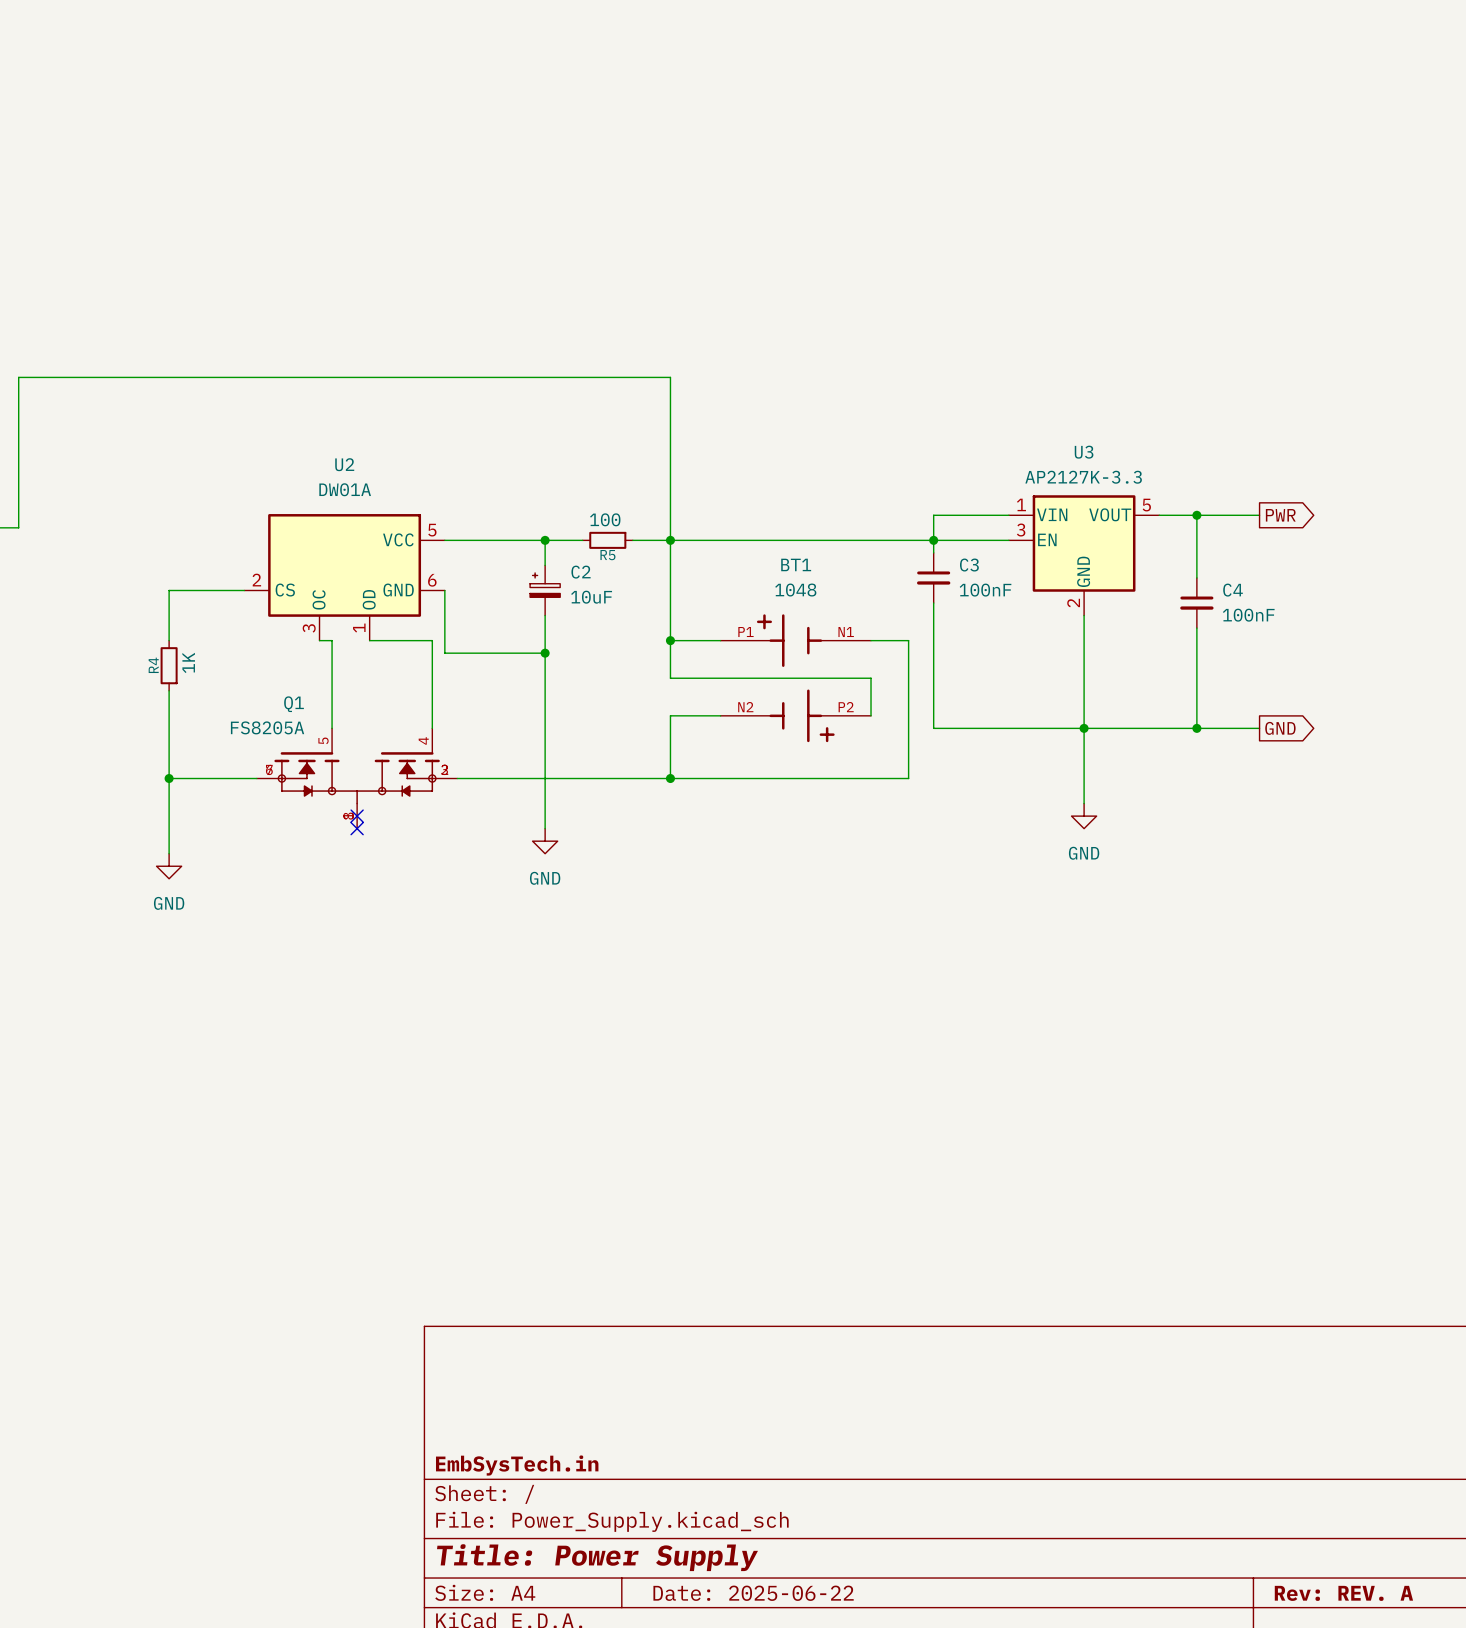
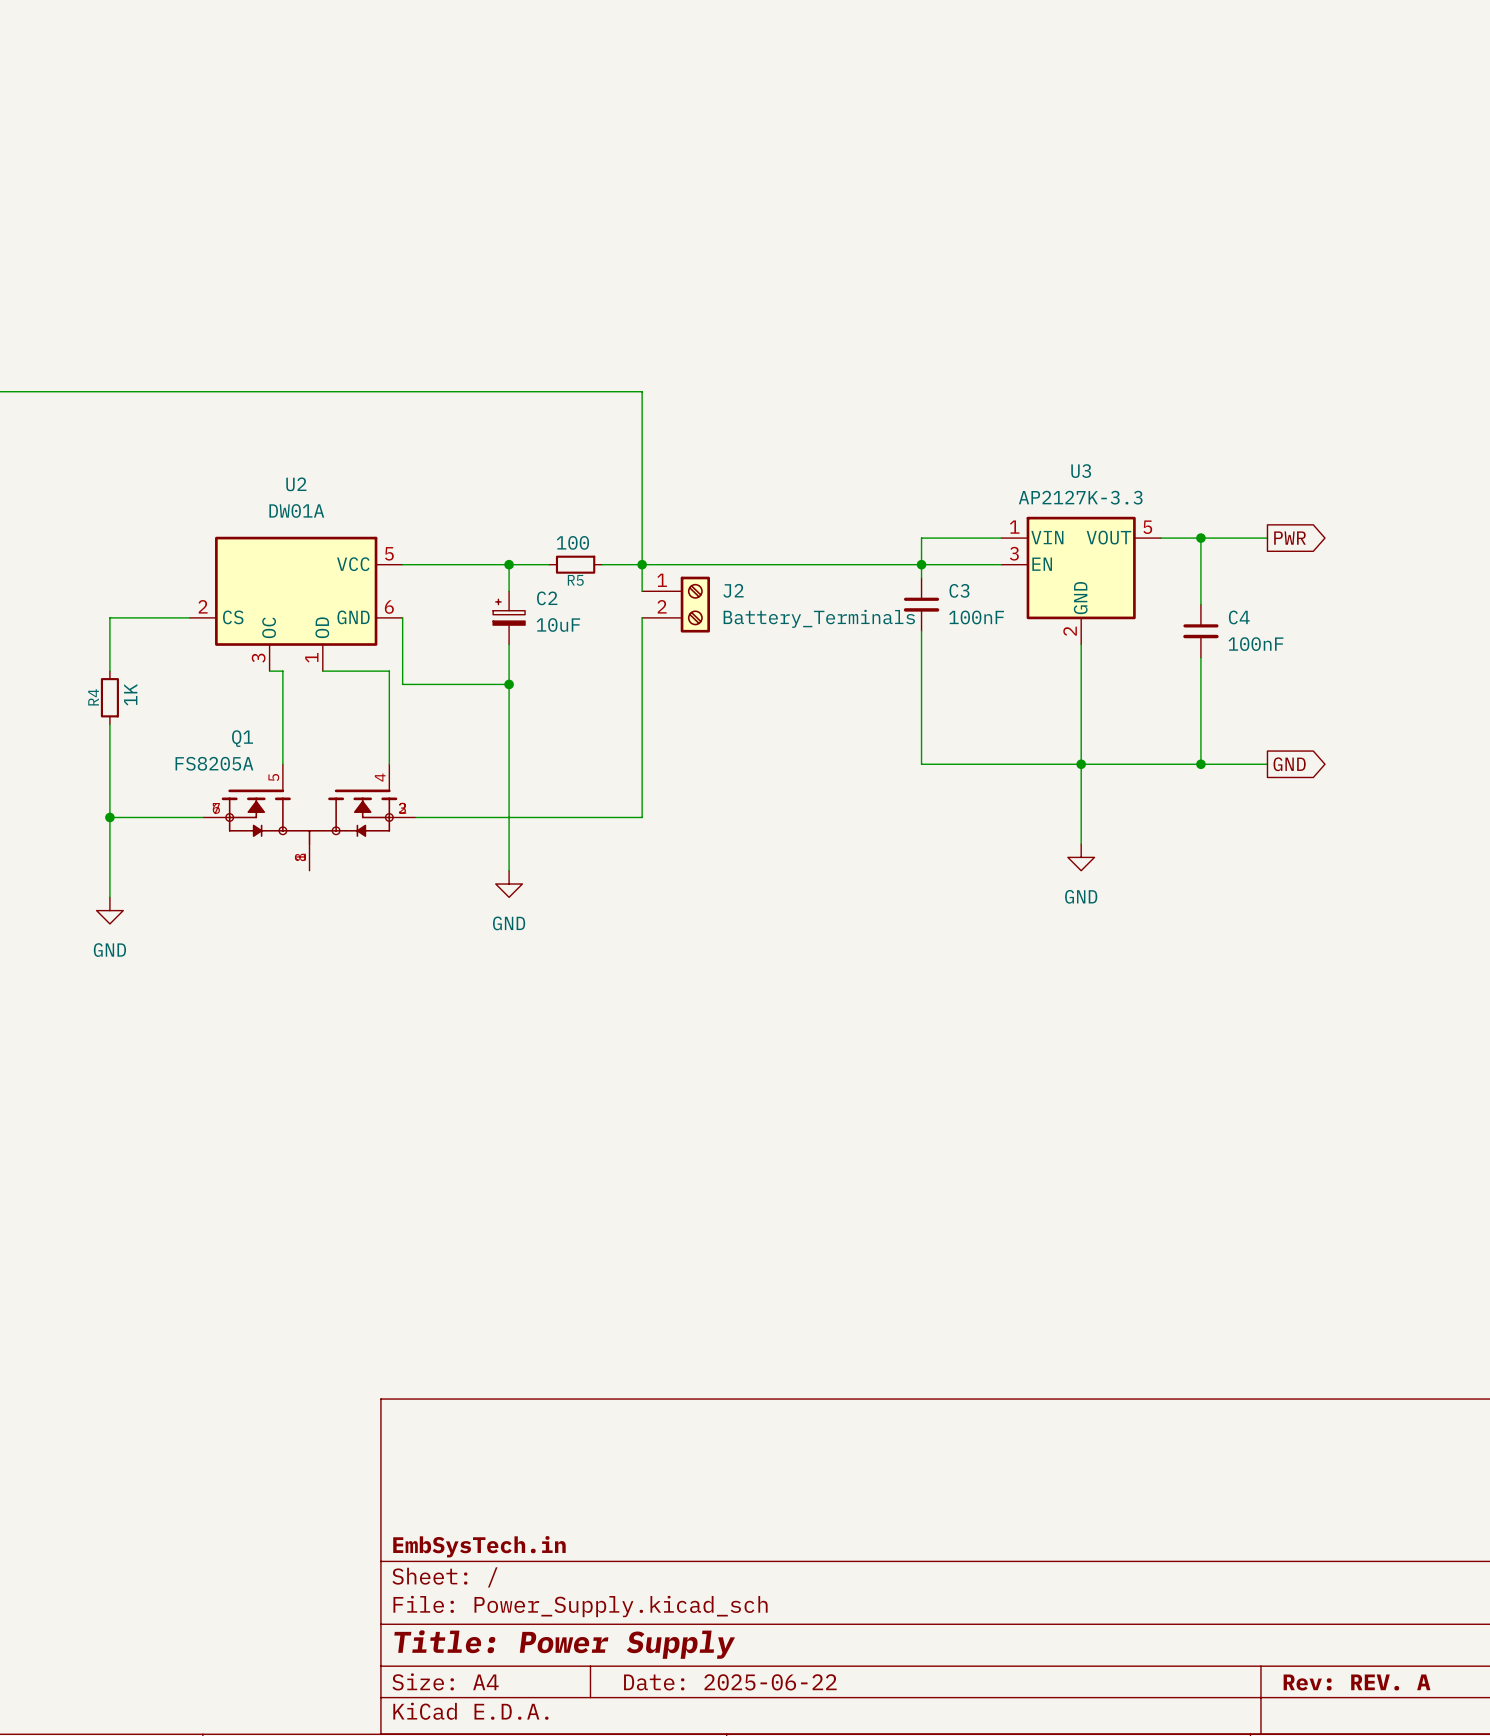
wire: (670, 565) (670, 590) -> none
J2: none -> Battery_Terminals (676, 604)
wire: (670, 640) (720, 640) -> none
junction: (670, 640) -> none
wire: (871, 640) (908, 640) (908, 778) (670, 778) -> none
wire: (670, 678) (871, 678) (871, 715) -> none
BT1: 1048 (795, 678) -> none
wire: (670, 715) (720, 715) -> (642, 750) (642, 711)
junction: (670, 778) -> none
no-connect mark: (357, 816) -> none
no-connect mark: (357, 828) -> none

